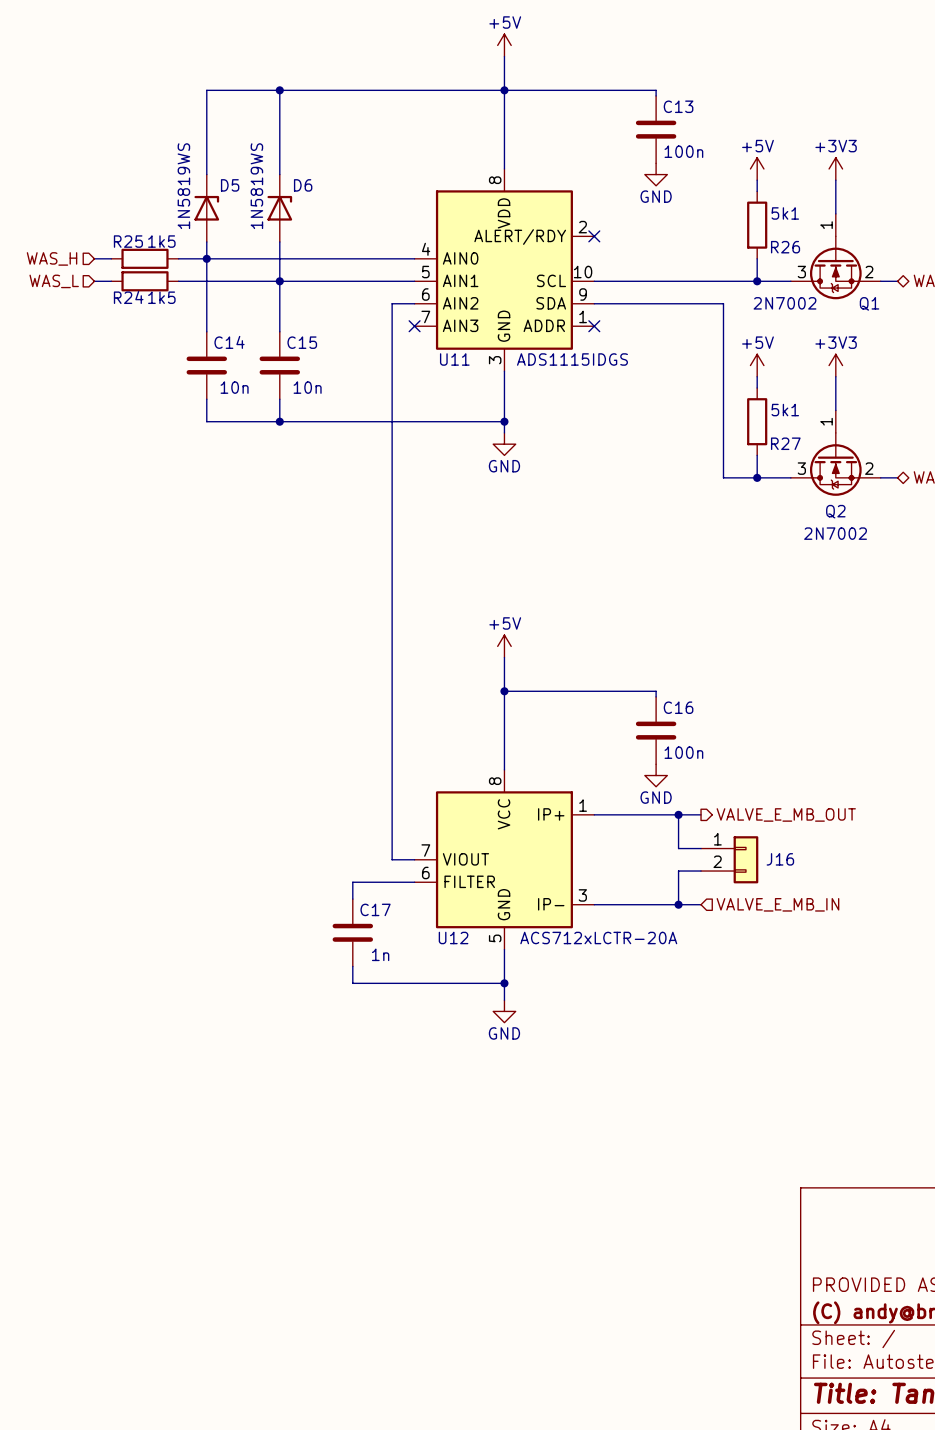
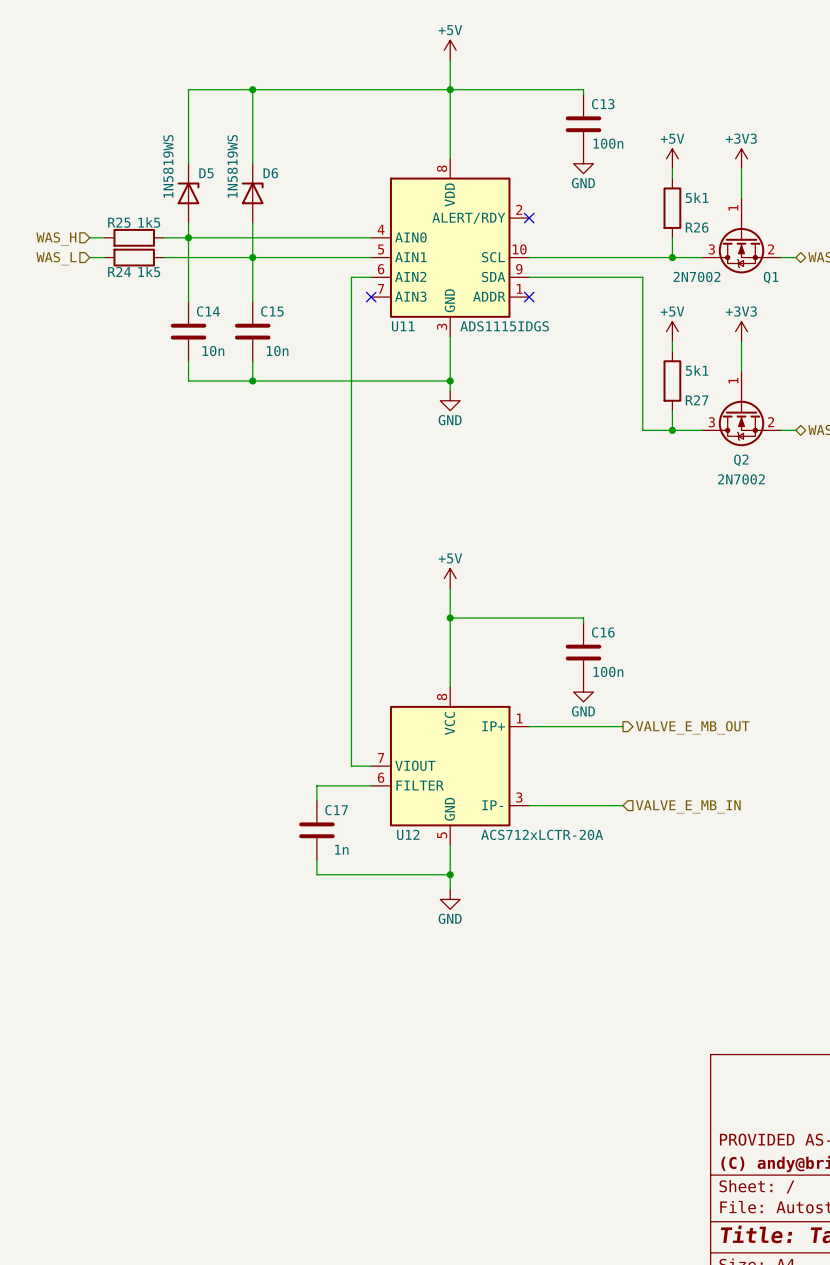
wire: (678, 814) (678, 848) (701, 848) -> none
junction: (678, 814) -> none
J16: (729, 859) -> none
wire: (701, 871) (678, 871) (678, 904) -> none
junction: (678, 904) -> none

